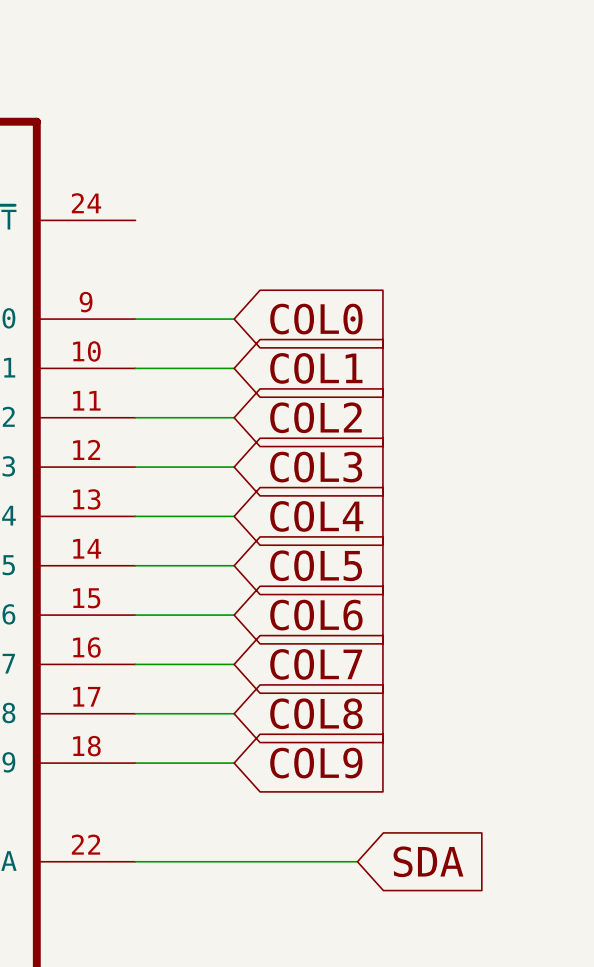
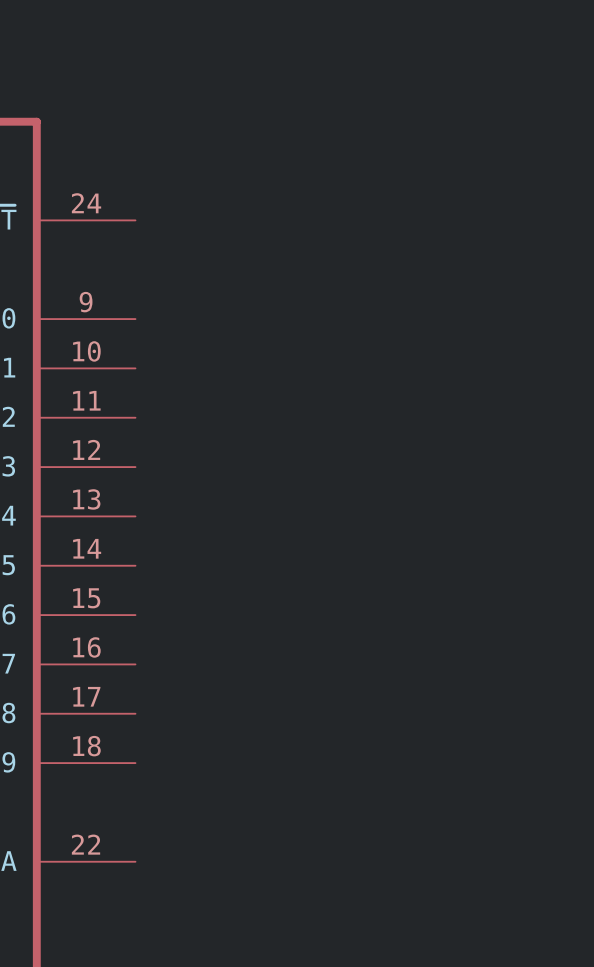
wire: (135, 319) (234, 319) -> none
global label: COL0 (316, 319) -> none
wire: (135, 368) (234, 368) -> none
global label: COL1 (316, 368) -> none
wire: (135, 417) (234, 417) -> none
global label: COL2 (315, 417) -> none
wire: (135, 467) (234, 467) -> none
global label: COL3 (316, 467) -> none
wire: (135, 516) (234, 516) -> none
global label: COL4 (316, 516) -> none
wire: (135, 565) (234, 565) -> none
global label: COL5 (316, 565) -> none
wire: (135, 615) (234, 615) -> none
global label: COL6 (316, 615) -> none
wire: (135, 664) (234, 664) -> none
global label: COL7 (316, 664) -> none
wire: (135, 713) (234, 713) -> none
global label: COL8 (316, 713) -> none
wire: (135, 763) (234, 763) -> none
global label: COL9 (316, 763) -> none
wire: (135, 861) (357, 861) -> none
global label: SDA (428, 861) -> none

